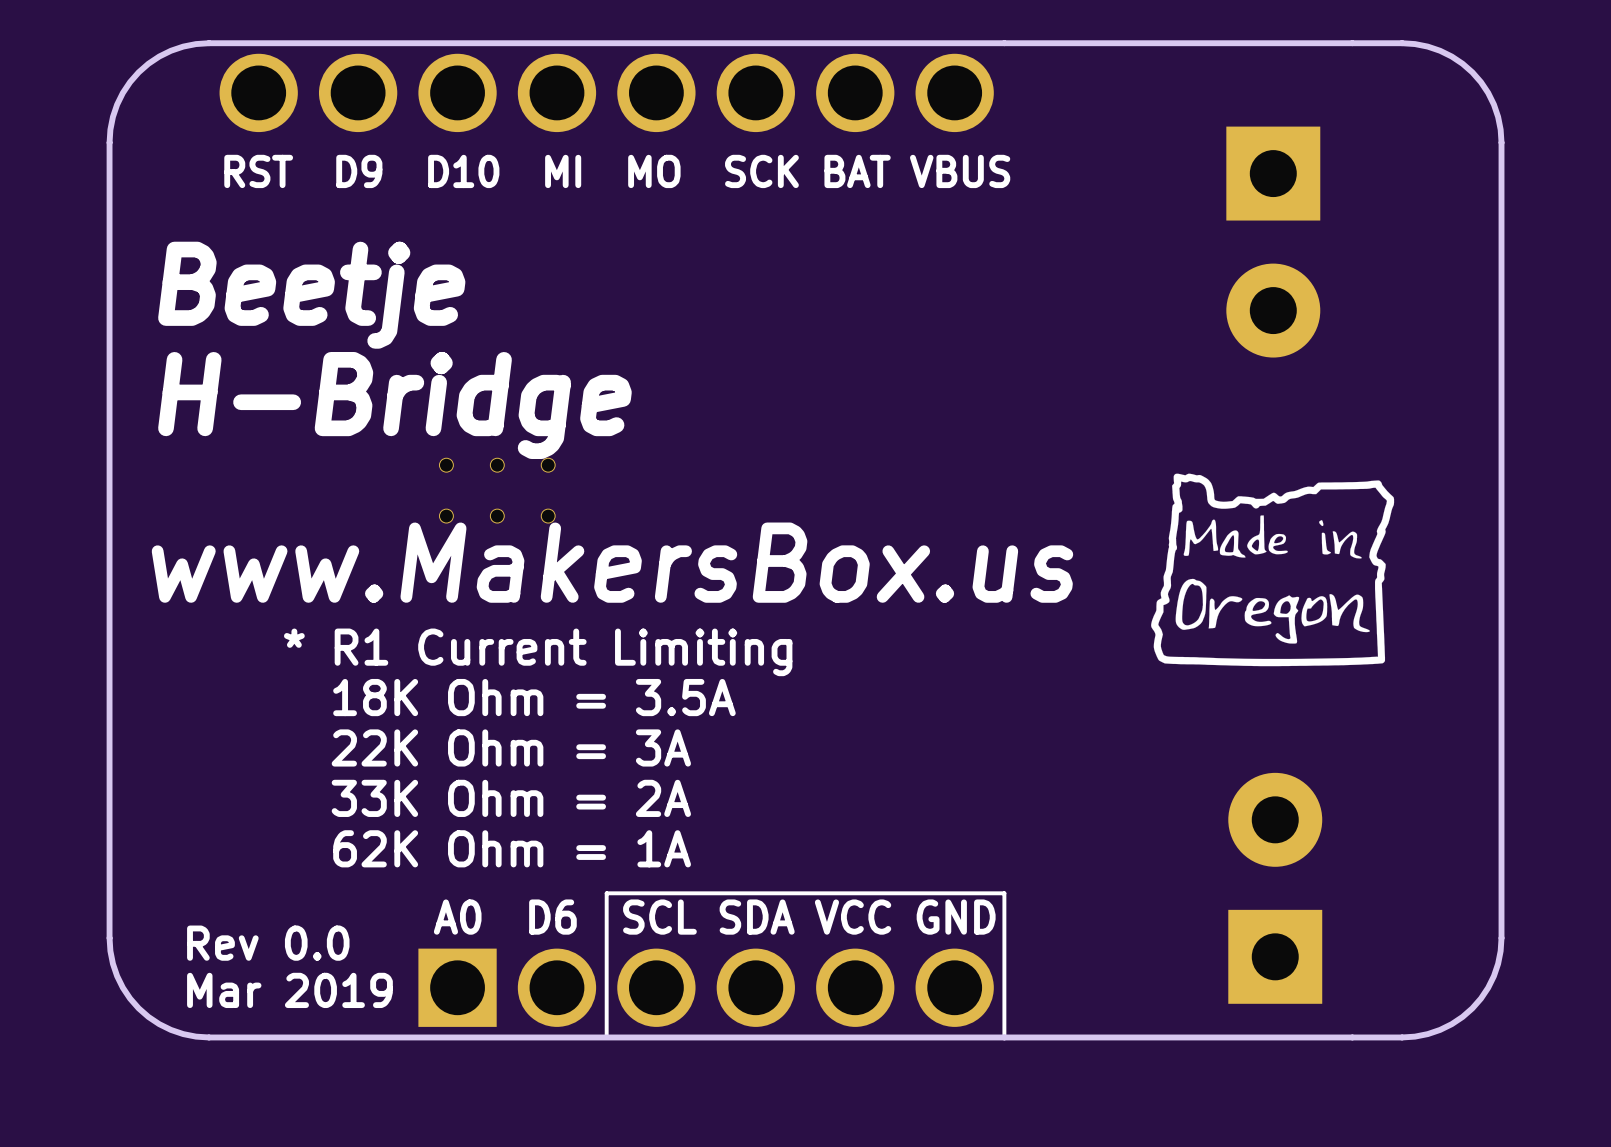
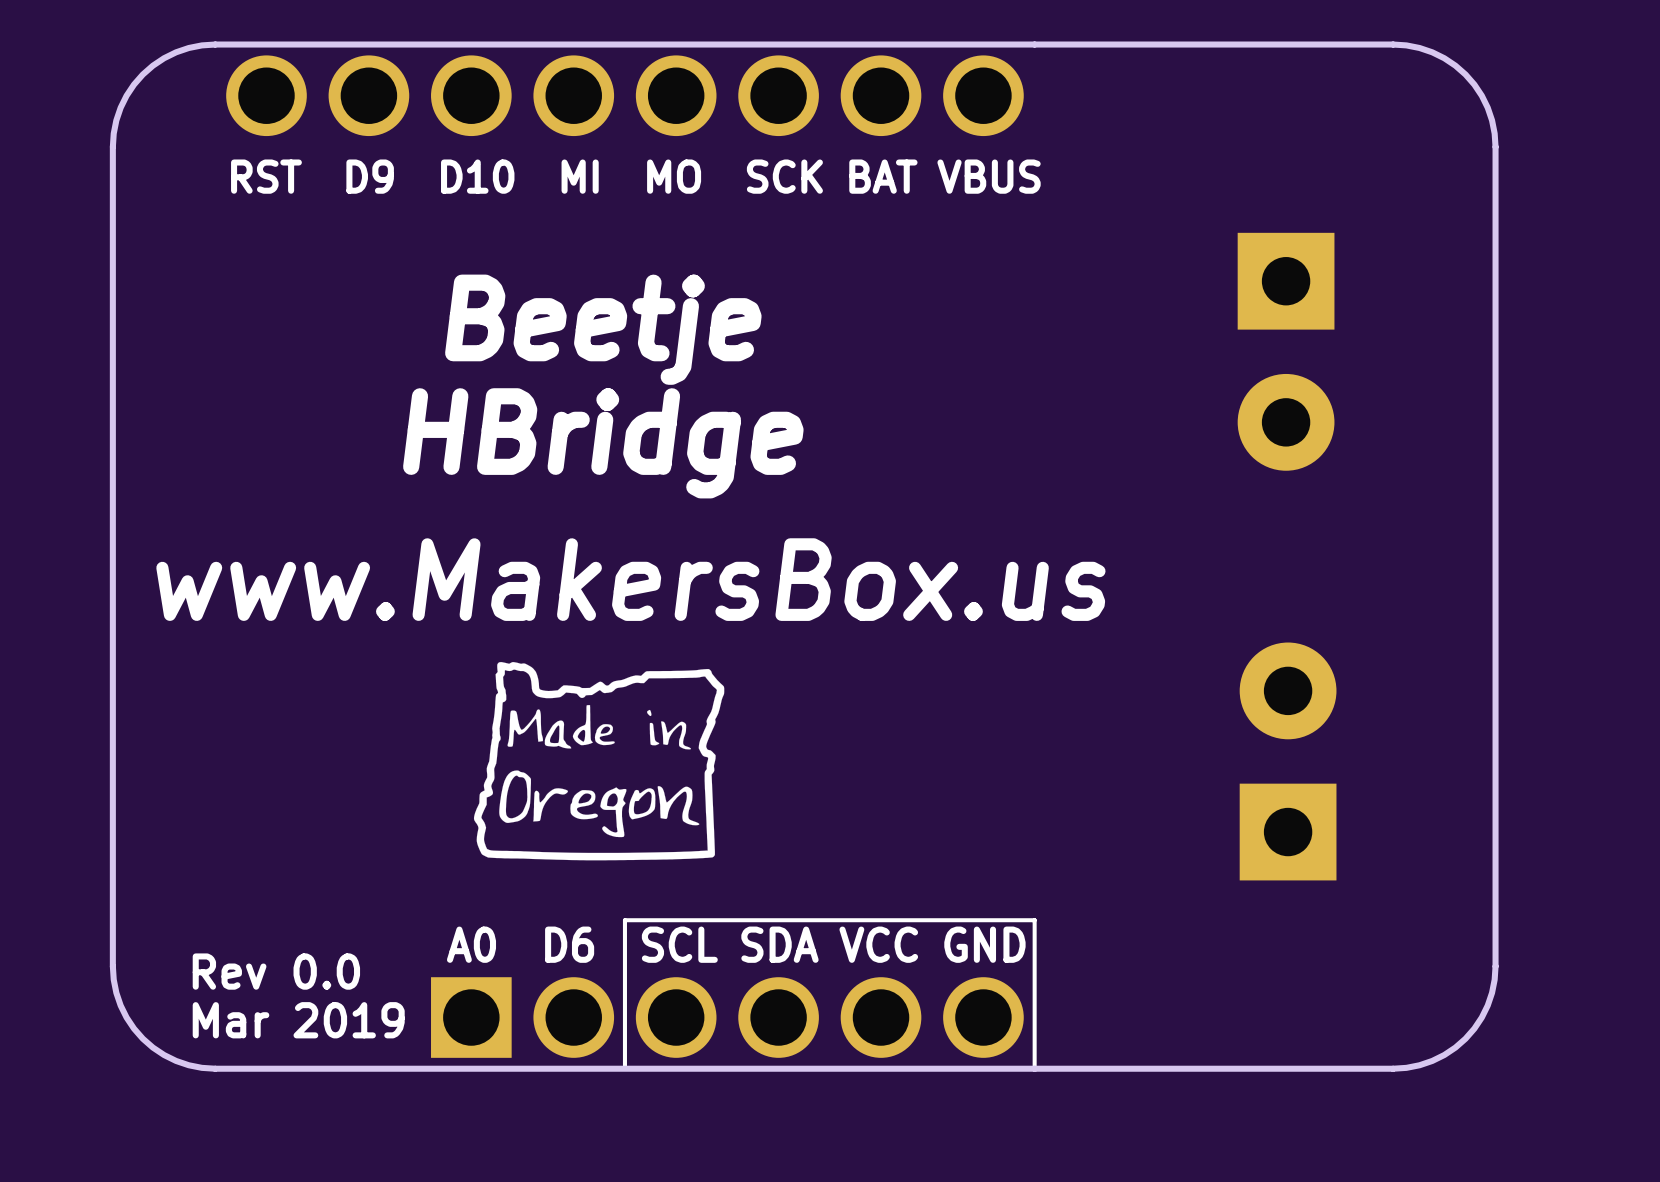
board edge: (1352, 43) (1415, 44) (1427, 46) (1451, 56) (1472, 72) (1488, 92) (1498, 116) (1501, 142) (1500, 951) (1493, 976) (1480, 998) (1472, 1008) (1451, 1024) (1427, 1034) (1415, 1036) (1352, 1037) -> (1393, 44) (1419, 48) (1432, 52) (1444, 58) (1465, 74) (1474, 84) (1487, 107) (1492, 120) (1495, 146) (1494, 979) (1492, 992) (1481, 1017) (1465, 1038) (1455, 1047) (1432, 1060) (1419, 1065) (1393, 1068)
part position: (1273, 242) -> (1286, 351)
text position: Beetje (311, 295) -> Beetje (603, 329)
text: H-Bridge (394, 405) -> HBridge (603, 443)
part: (497, 490) -> none
drawing position: (1272, 569) -> (599, 761)
text: * R1 Current Limiting (538, 652) -> none
text: 18K Ohm = 3.5A (534, 697) -> none
text: 22K Ohm = 3A (511, 747) -> none
text: 33K Ohm = 2A (511, 798) -> none
text: 62K Ohm = 1A (512, 848) -> none
part position: (1275, 888) -> (1288, 761)

